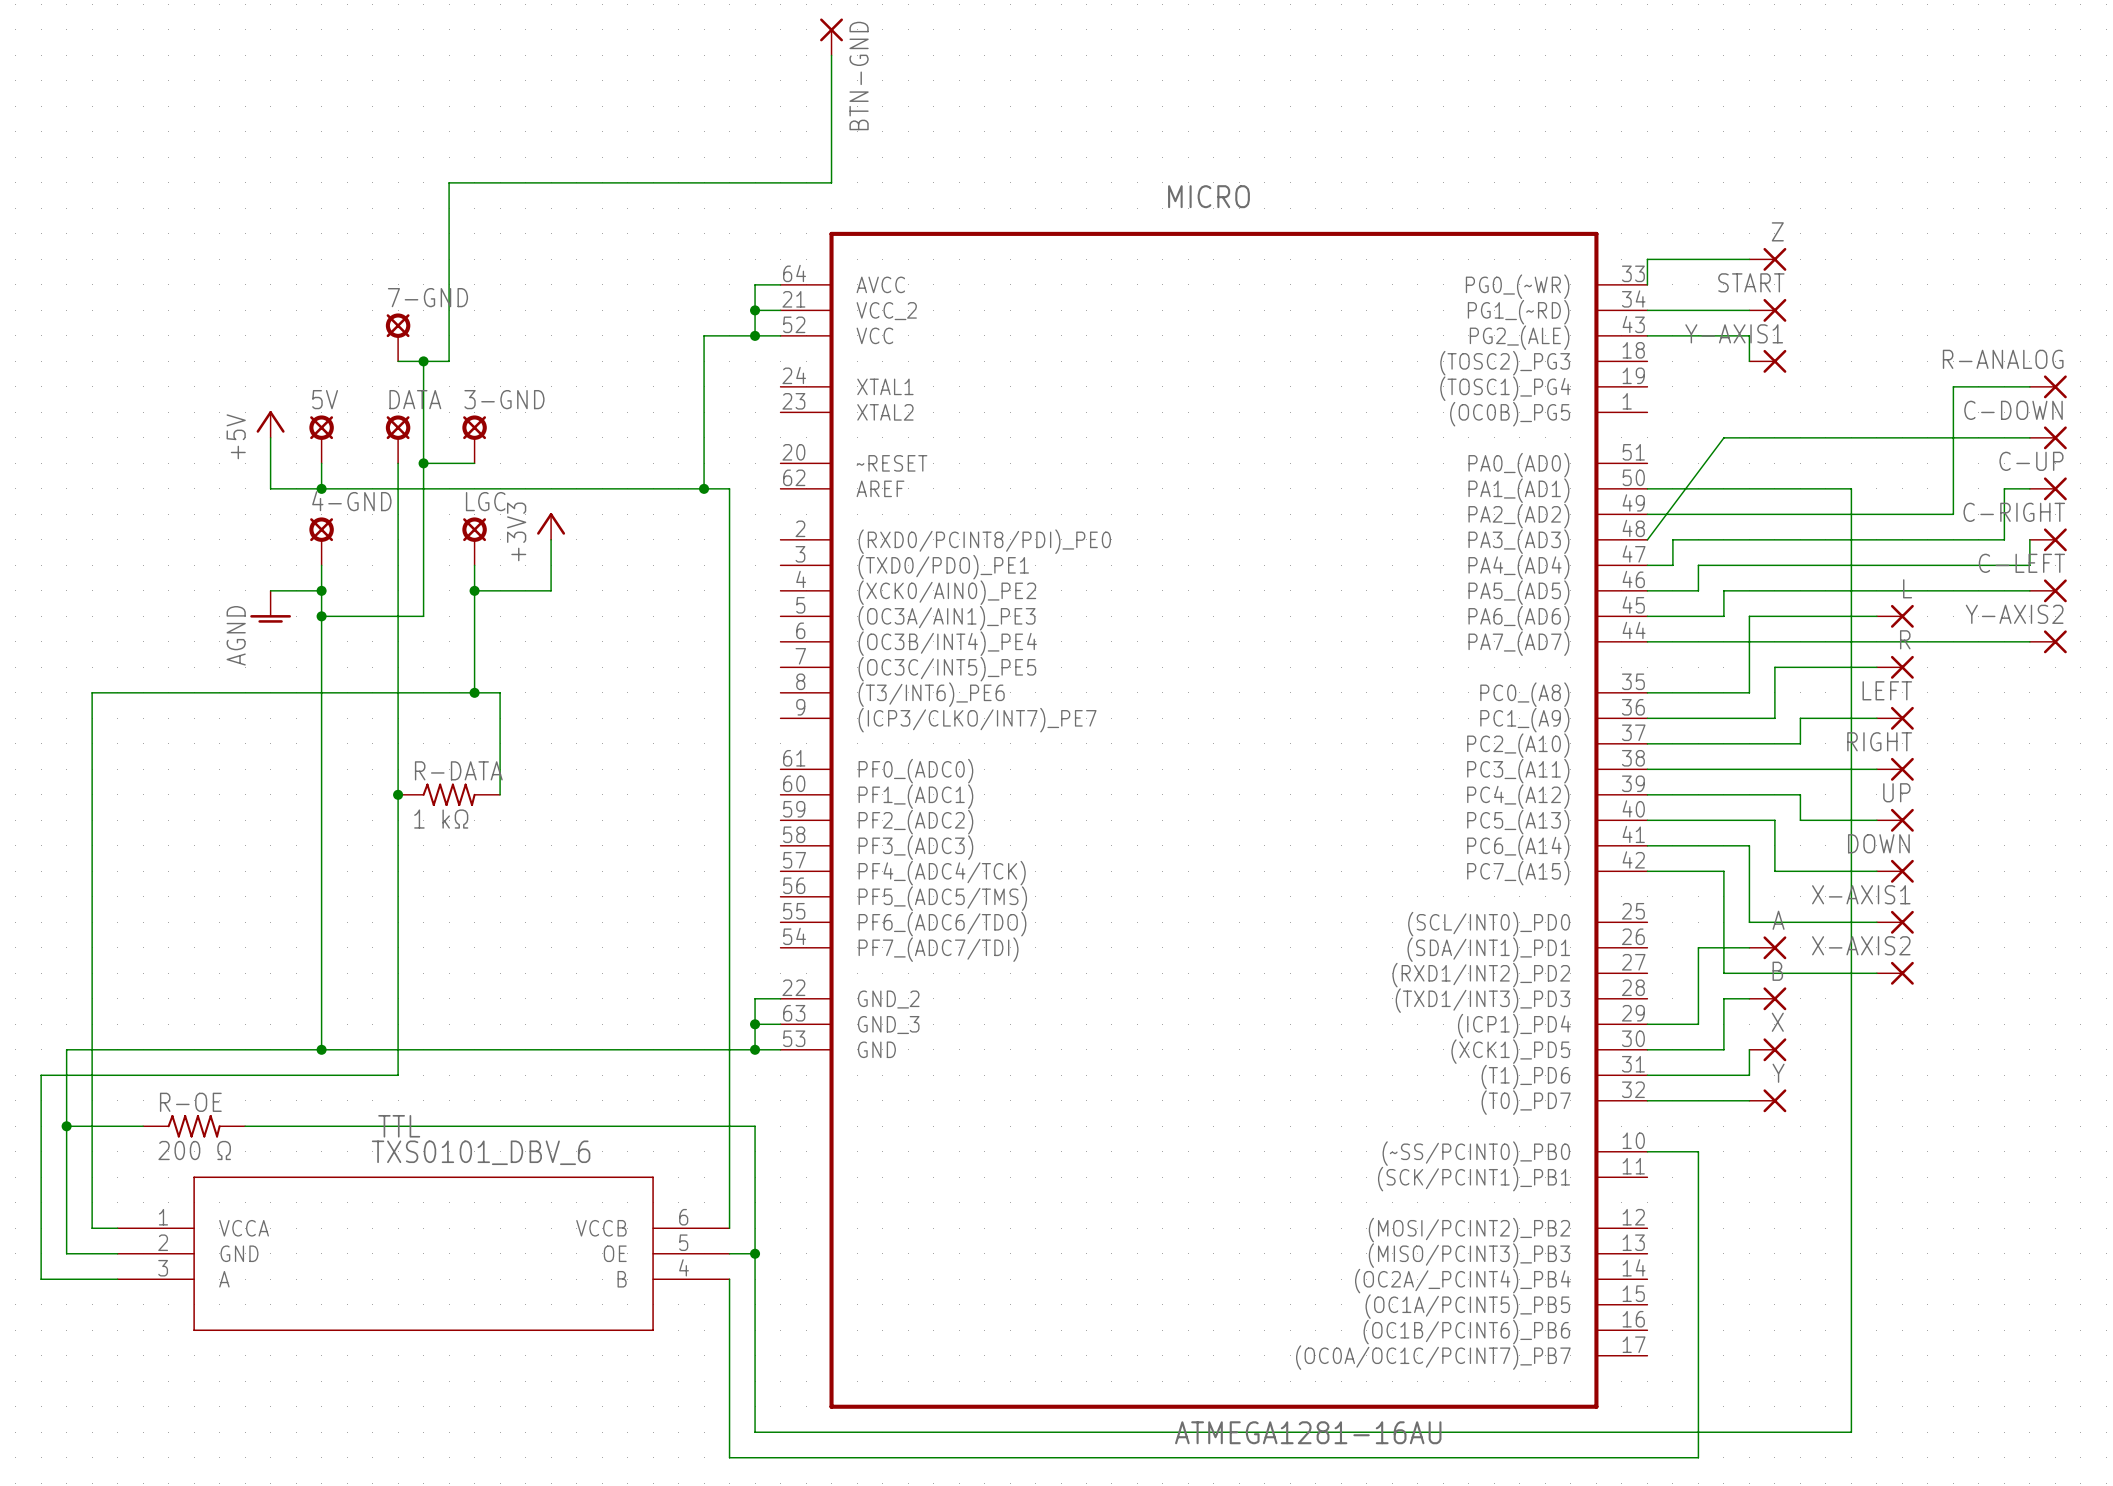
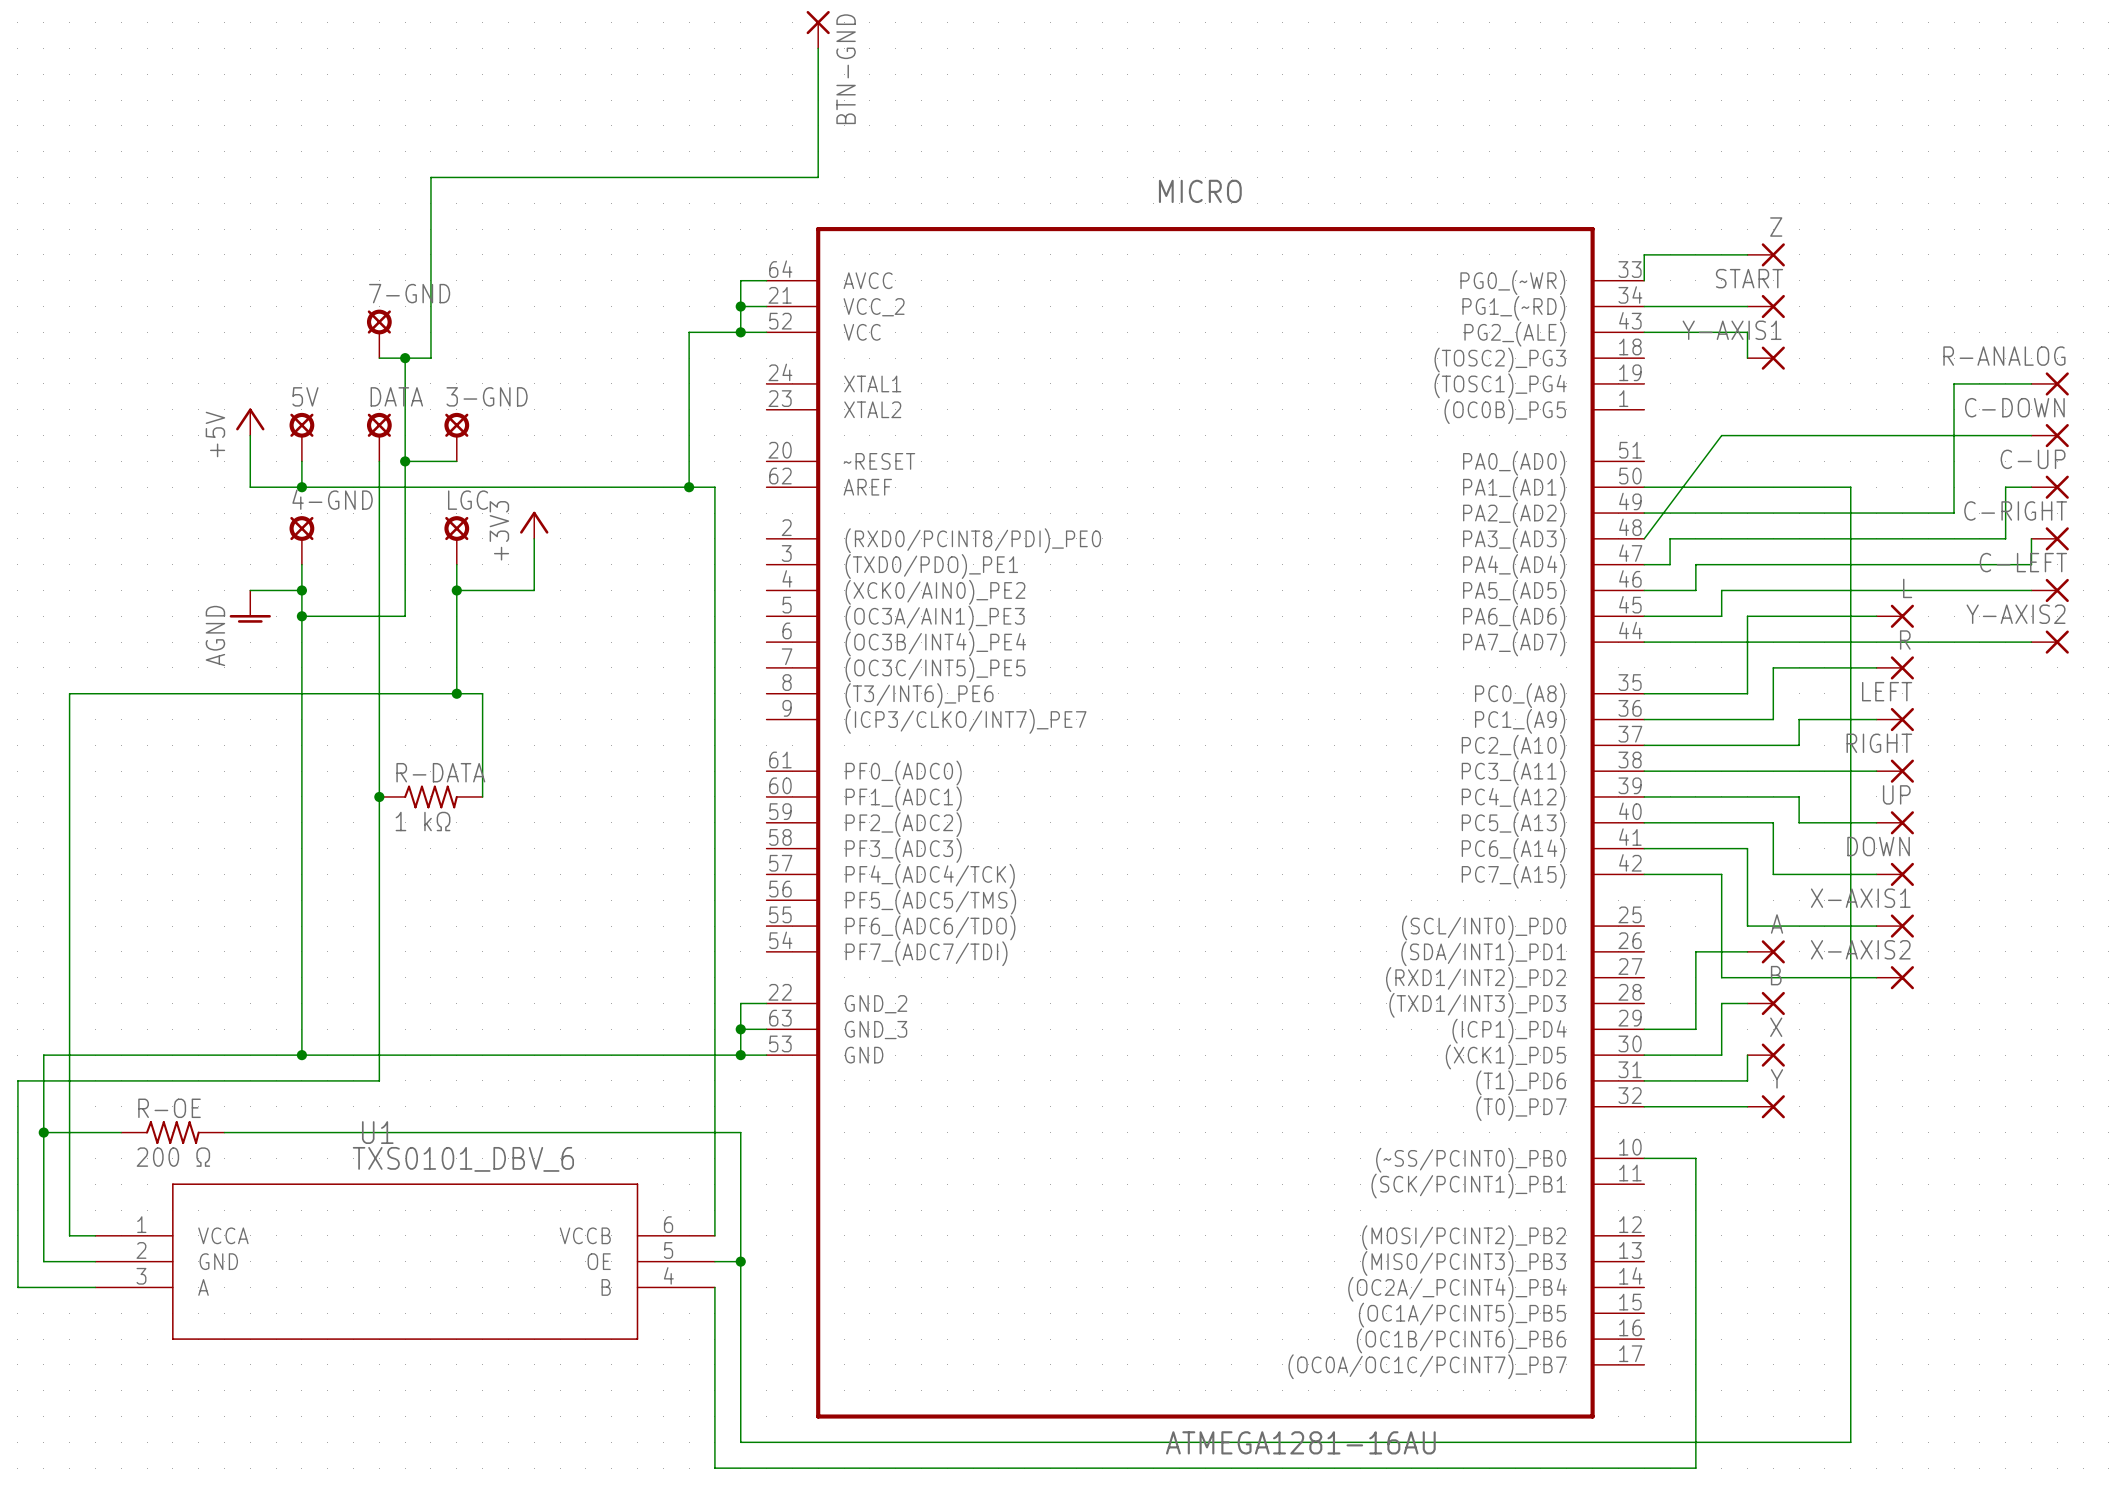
TTL name: TTL (399, 1126) -> U1 (377, 1132)

